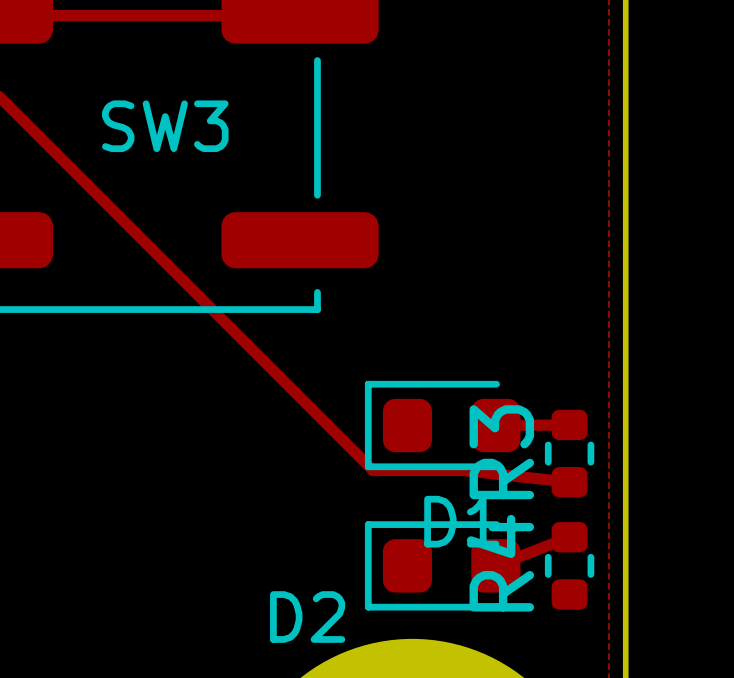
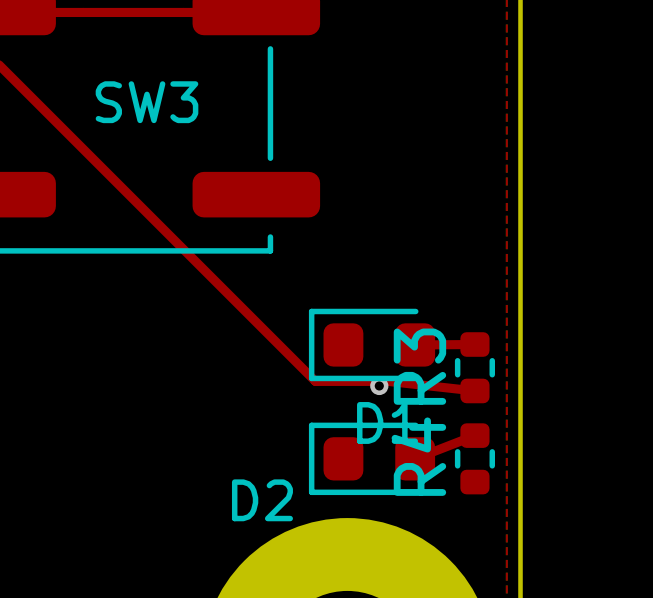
via: none -> (379, 385)

